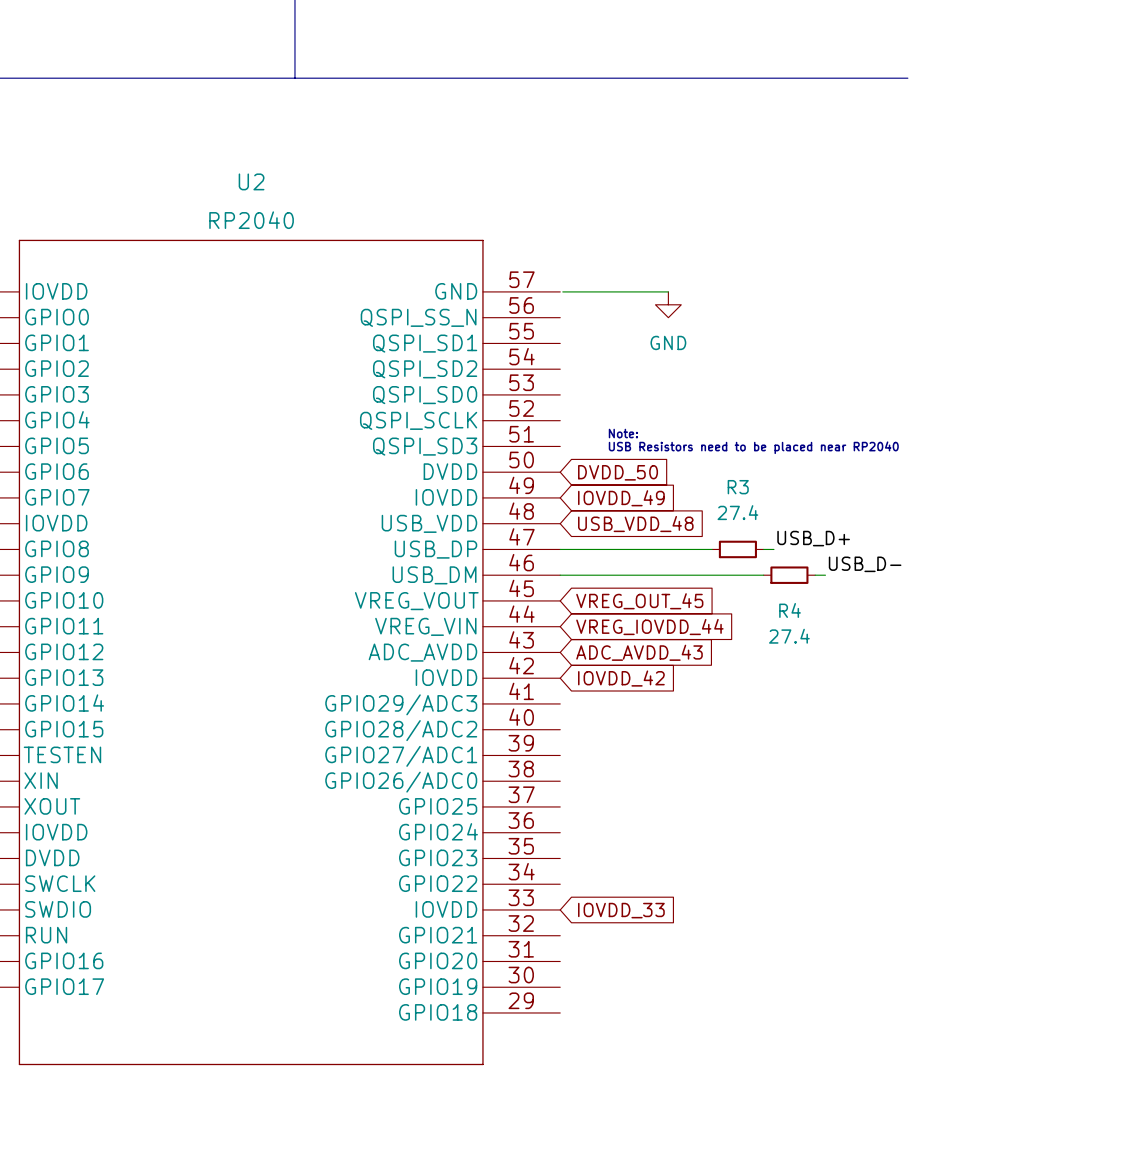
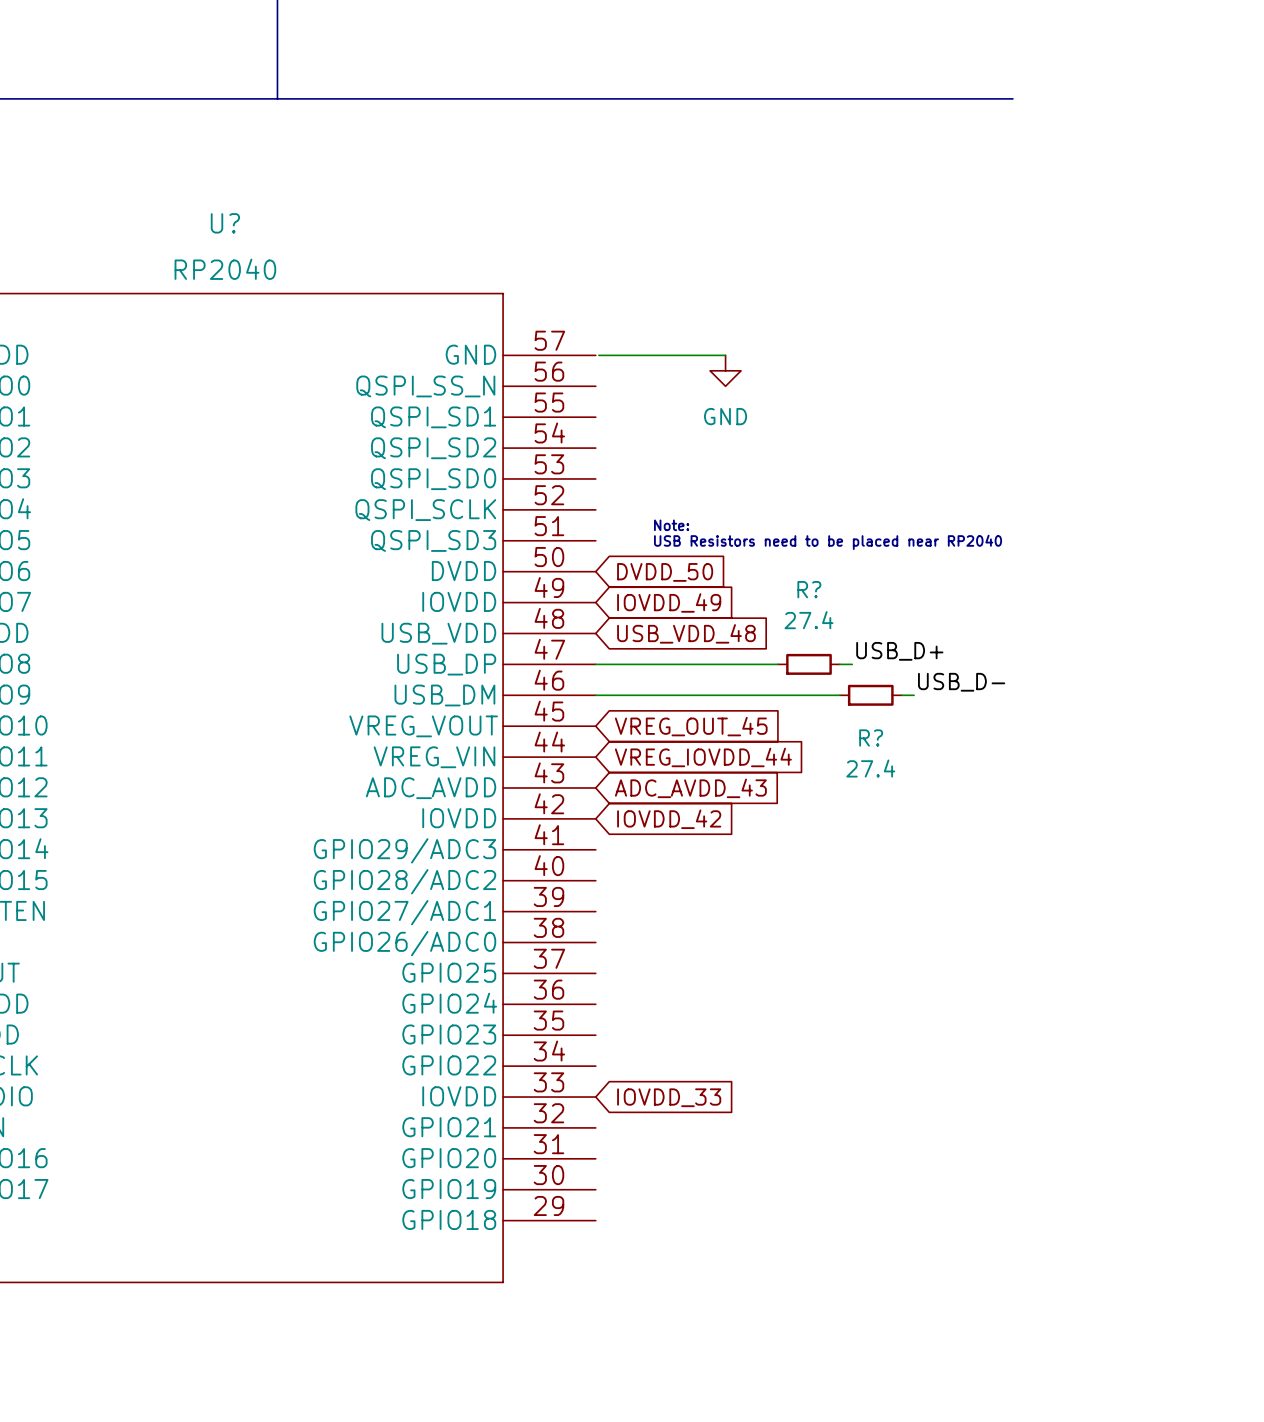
U2 name: U2 (251, 181) -> U? (225, 223)
R3 name: R3 (738, 487) -> R? (809, 589)
R4 name: R4 (790, 610) -> R? (871, 737)

